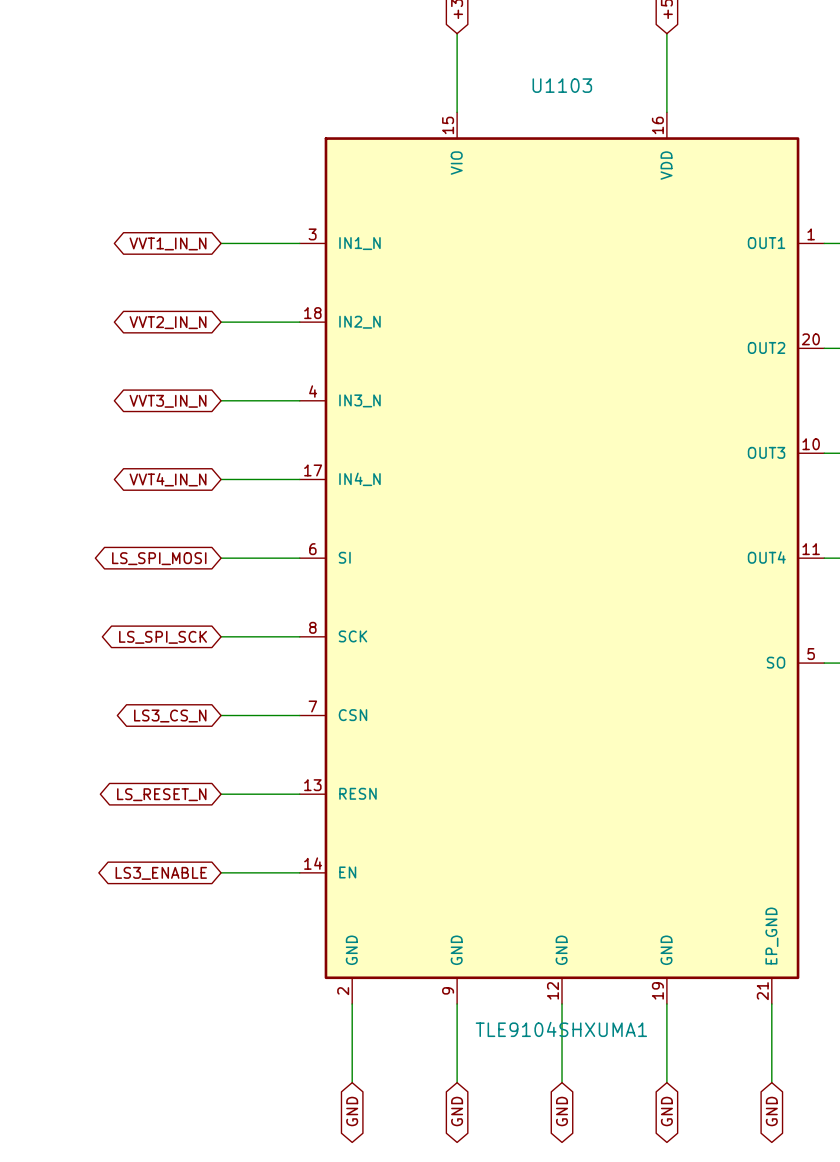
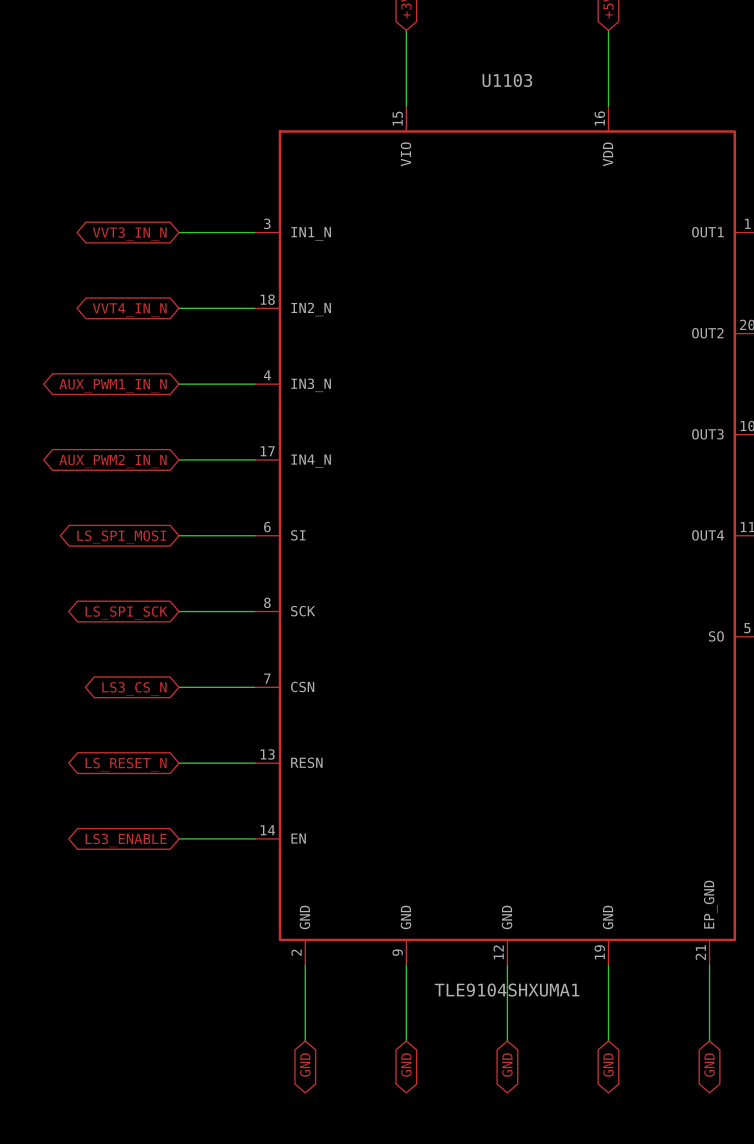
global label: VVT1_IN_N (168, 243) -> VVT3_IN_N (129, 234)
global label: VVT2_IN_N (168, 322) -> VVT4_IN_N (129, 309)
global label: VVT3_IN_N (168, 401) -> AUX_PWM1_IN_N (113, 385)
global label: VVT4_IN_N (168, 479) -> AUX_PWM2_IN_N (113, 461)

